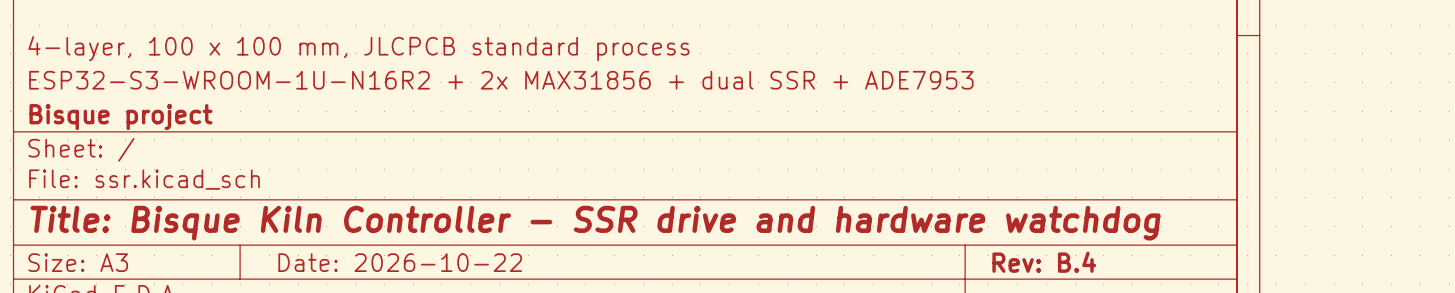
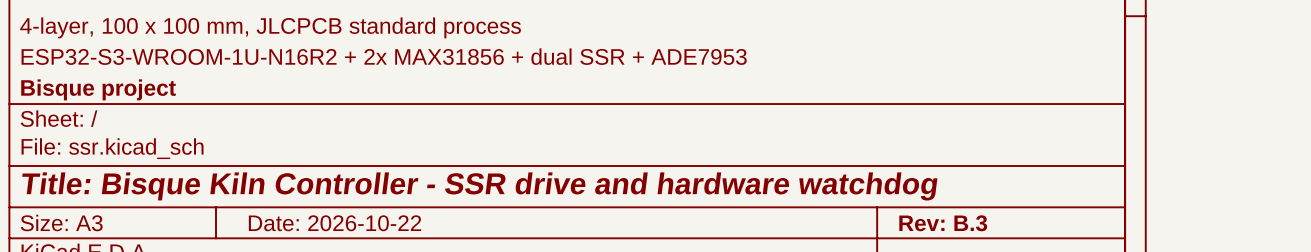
title block: Rev: B.4 (1044, 262) -> Rev: B.3 (943, 223)

